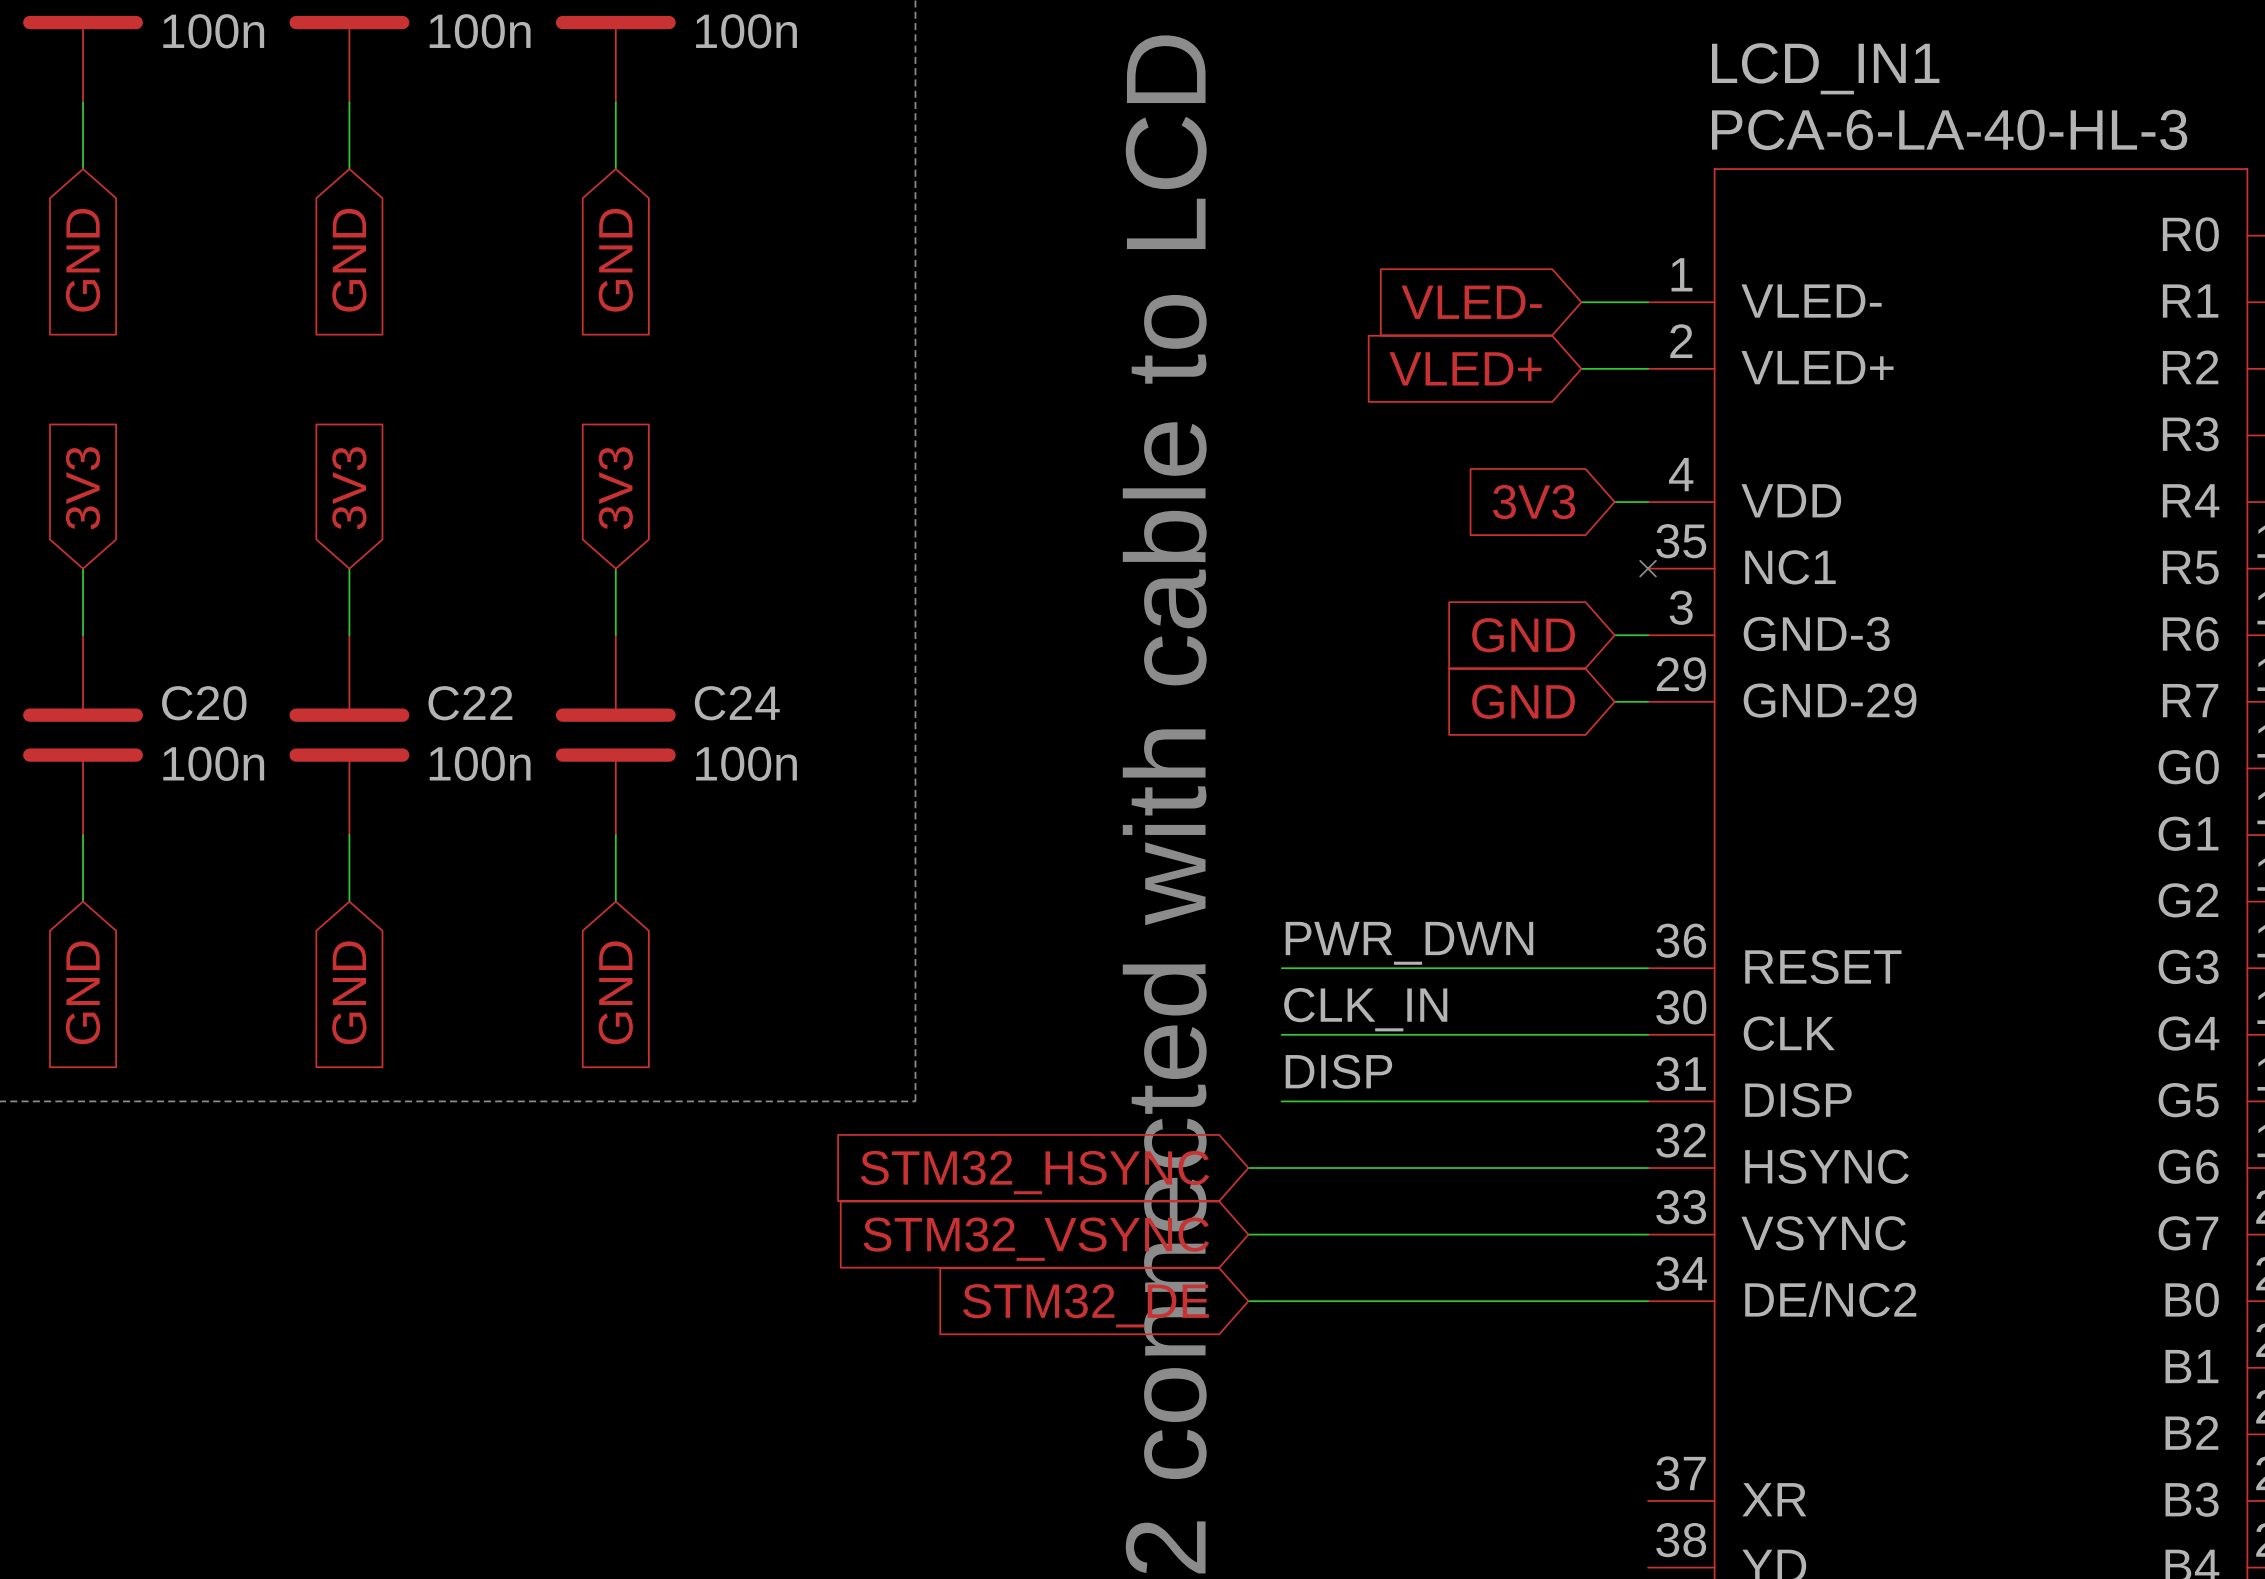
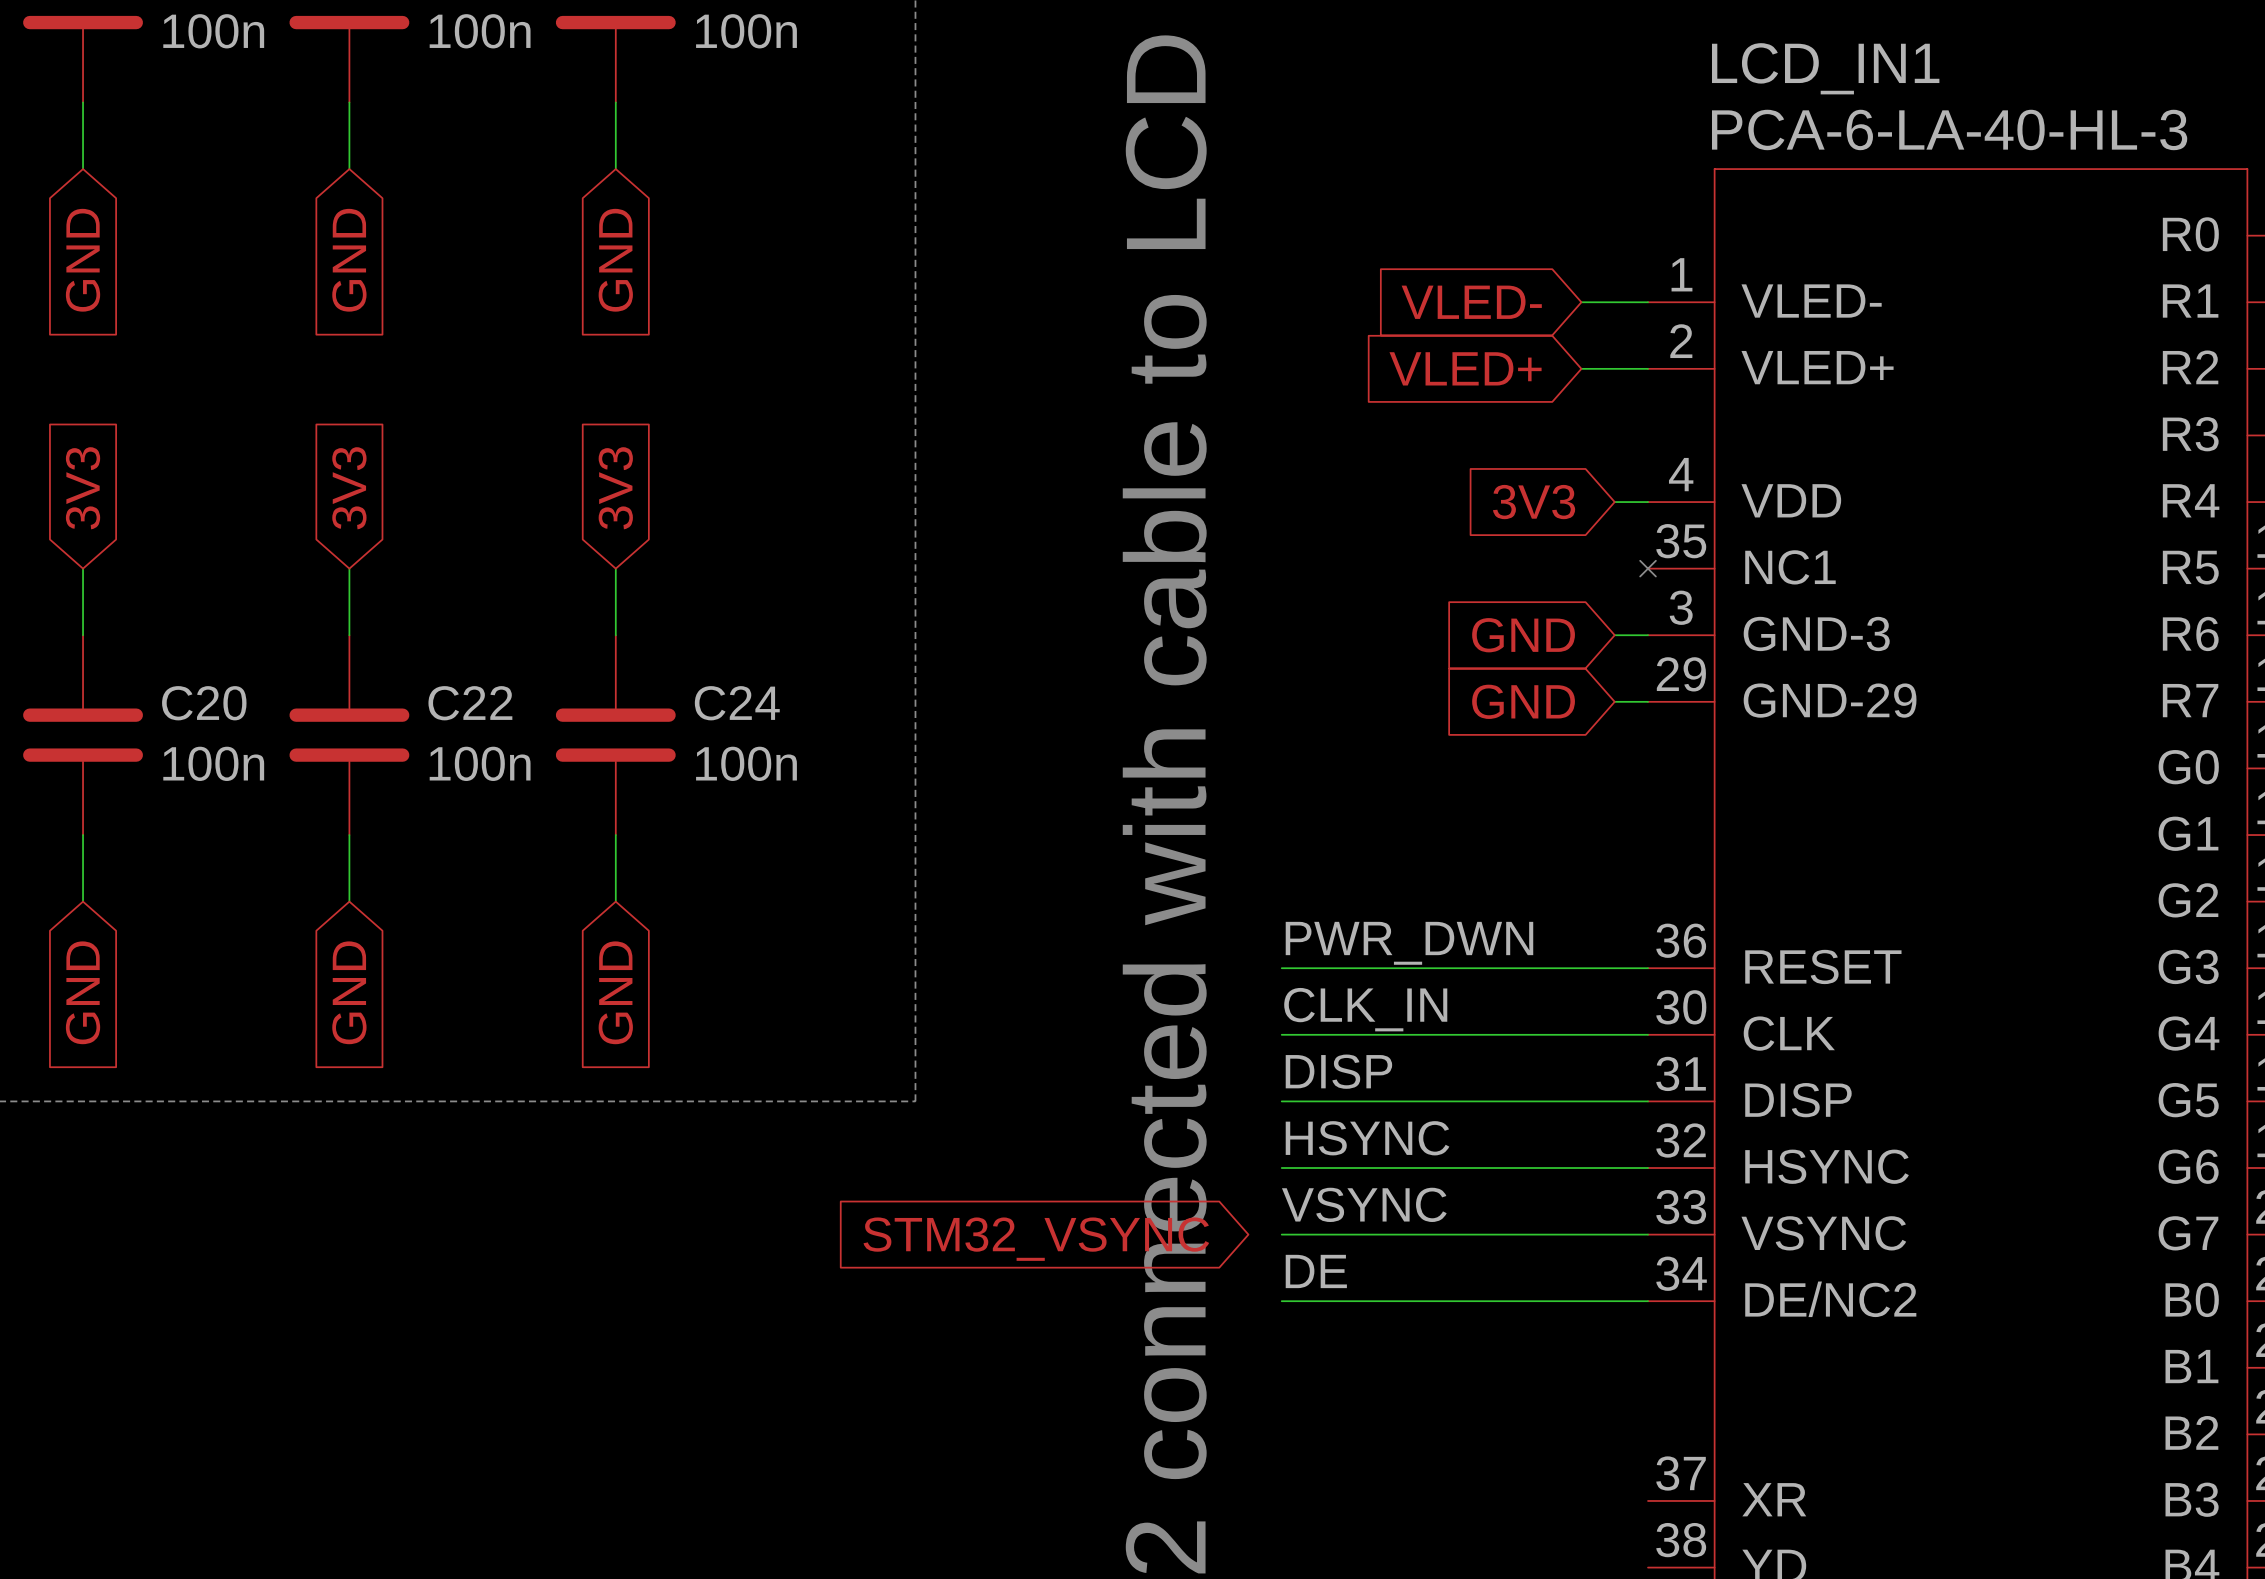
label: none -> HSYNC (1367, 1138)
wire: (1248, 1168) (1281, 1168) -> none
global label: STM32_HSYNC (1035, 1172) -> none
label: none -> VSYNC (1364, 1204)
wire: (1248, 1234) (1281, 1234) -> none
label: none -> DE (1316, 1271)
wire: (1248, 1301) (1281, 1301) -> none
global label: STM32_DE (1085, 1305) -> none

